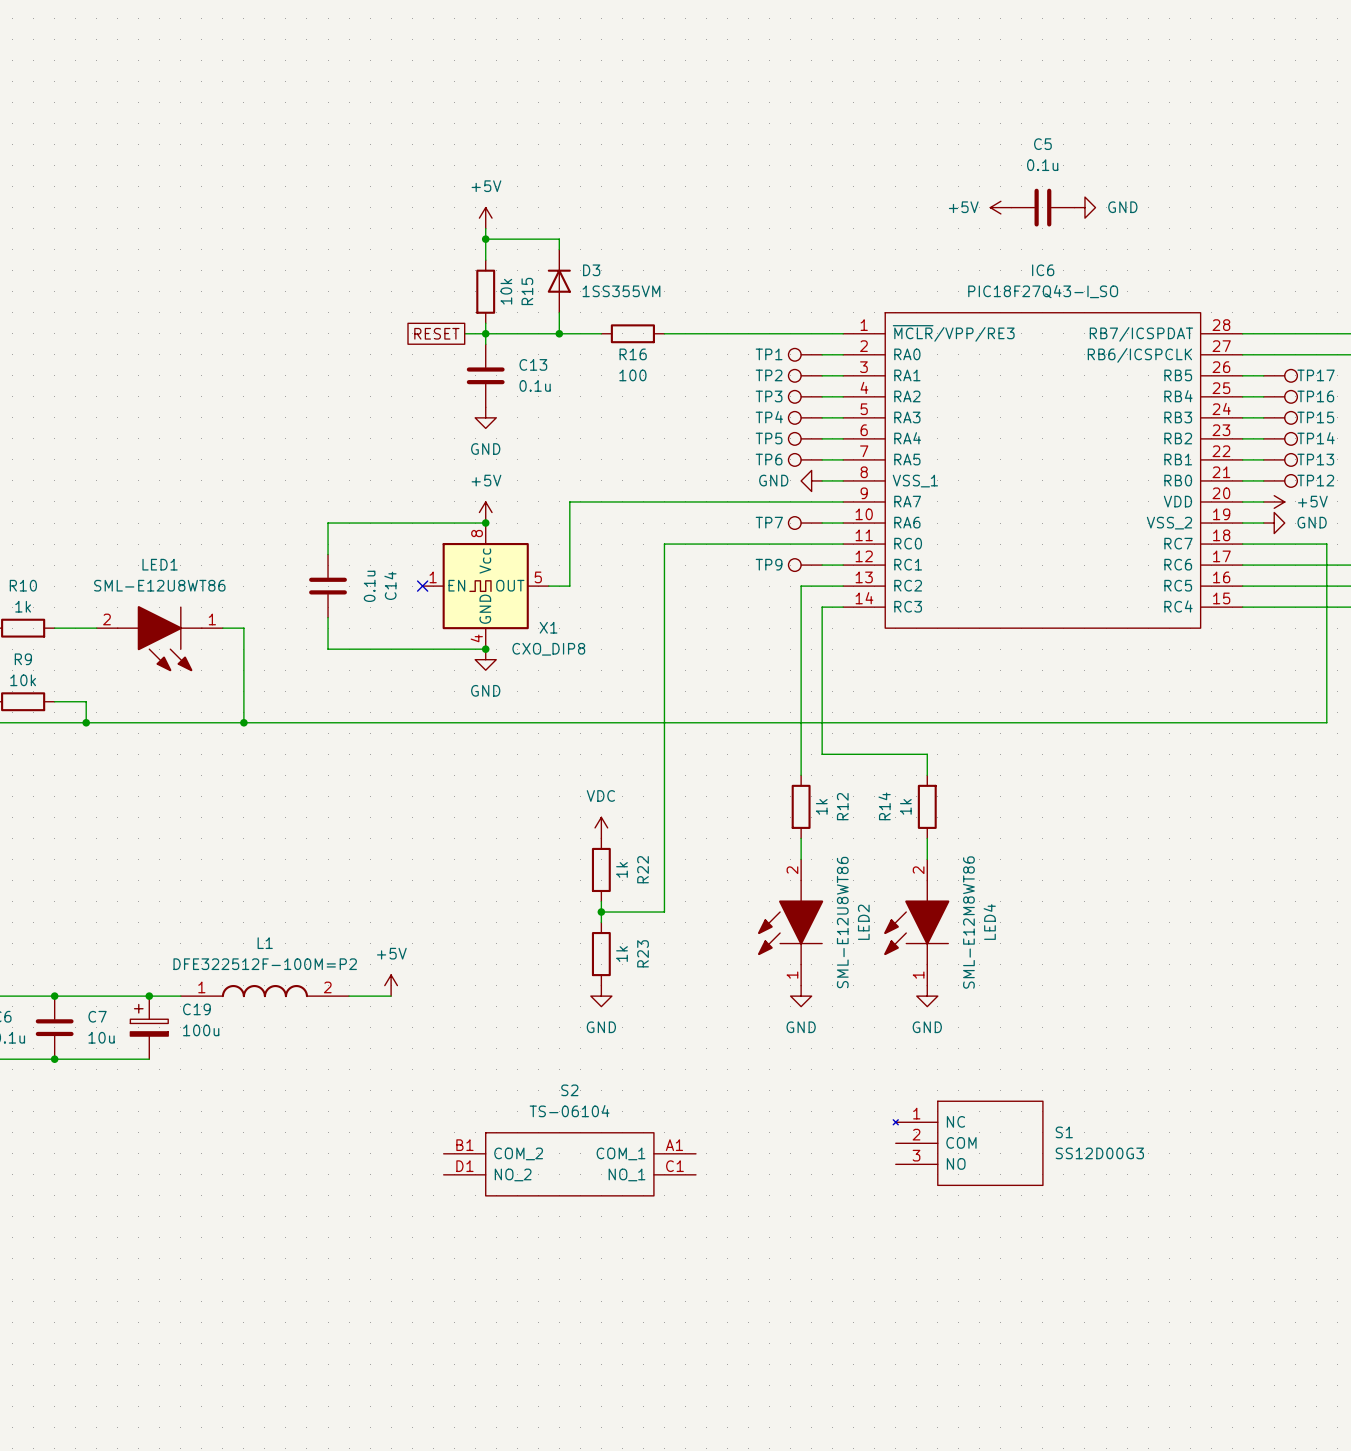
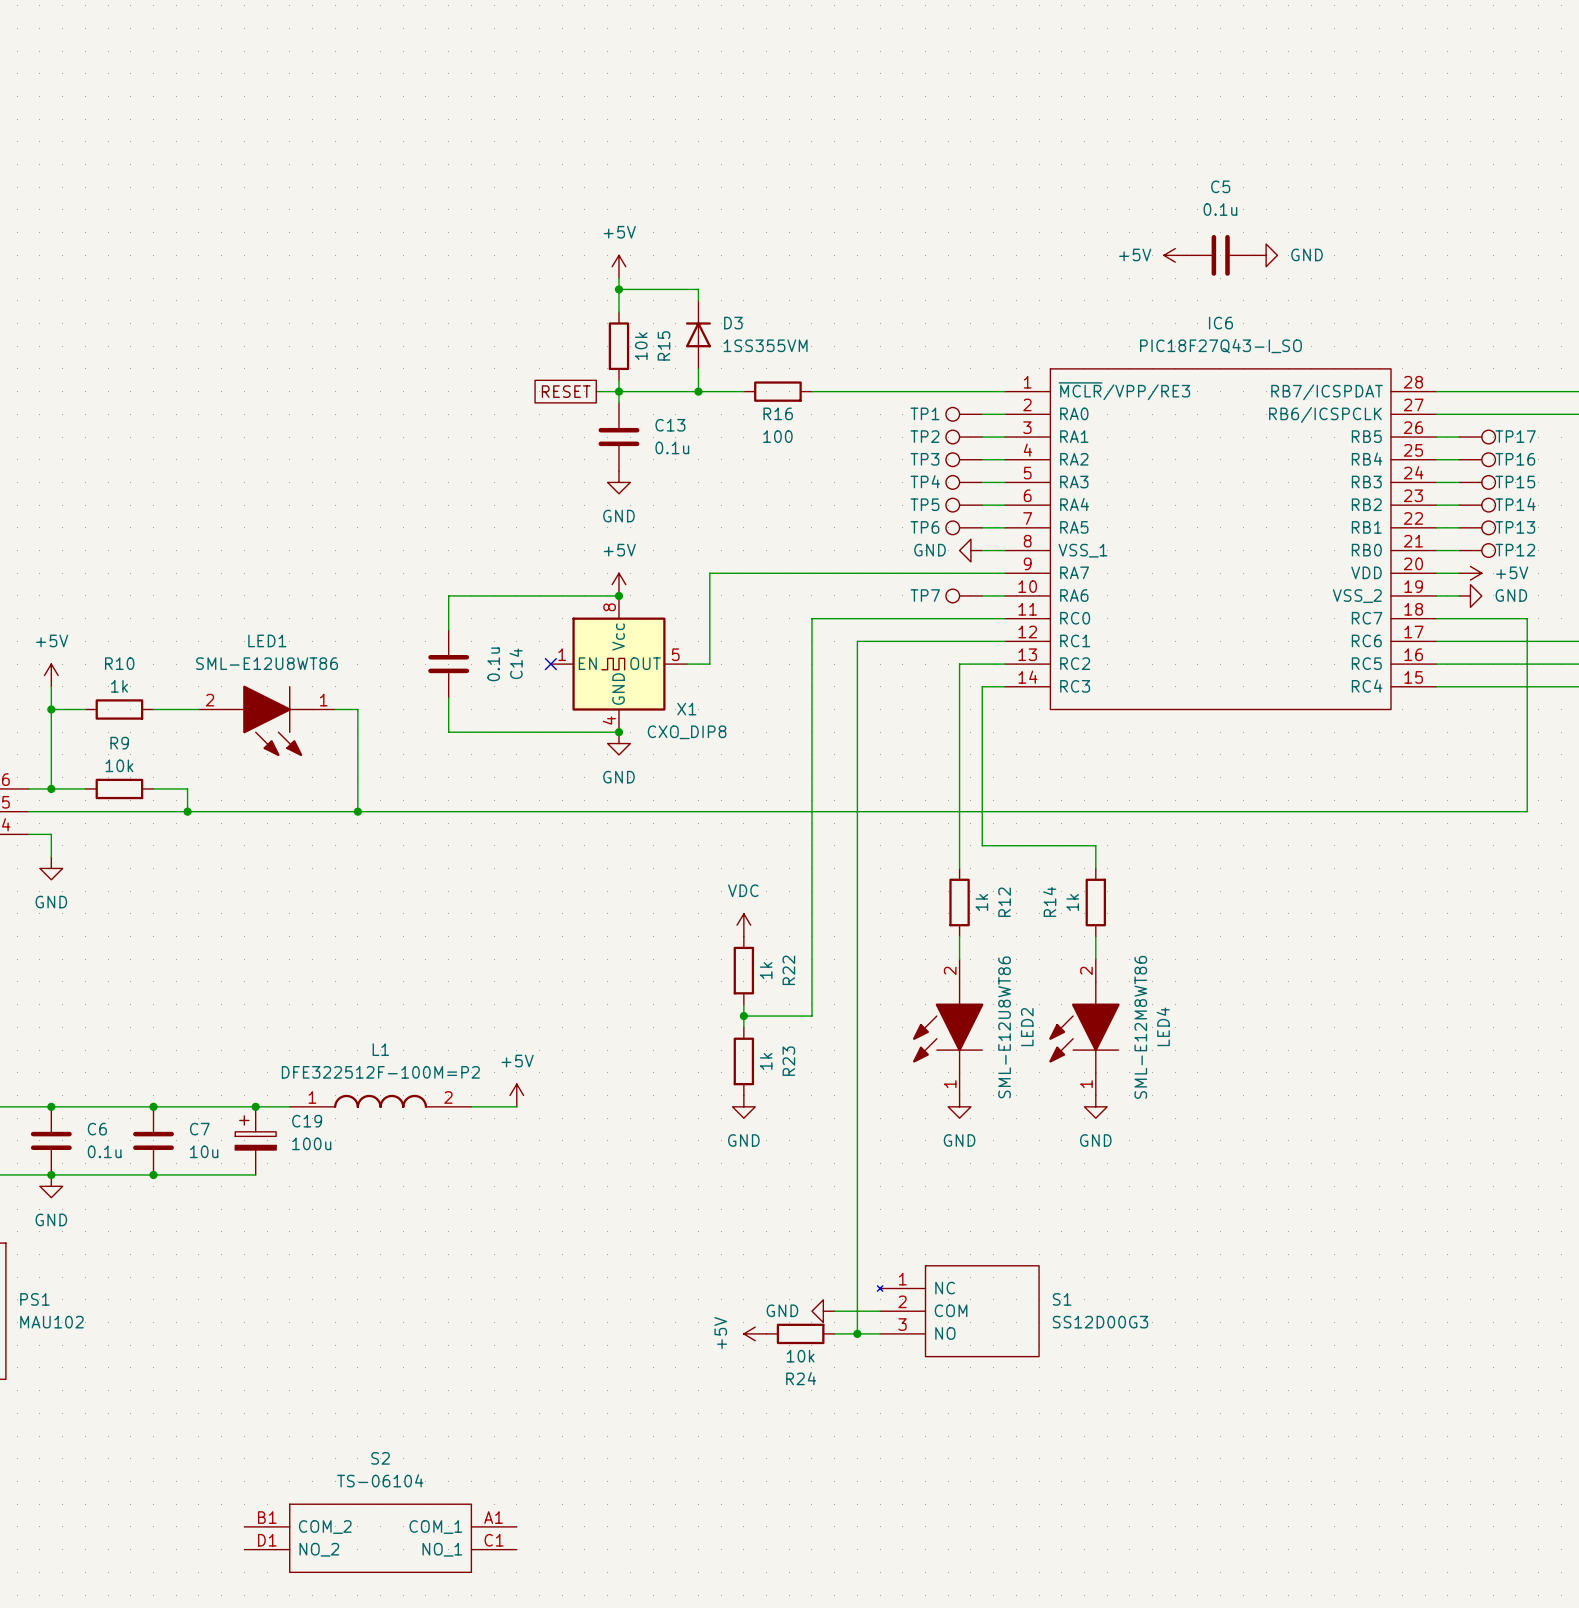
TP9: (805, 565) -> none
wire: none -> (982, 641) (857, 641) (857, 1333)
S1 position: (968, 1143) -> (958, 1311)
S2 position: (569, 1164) -> (380, 1538)
power symbol: none -> GND (823, 1311)
wire: none -> (834, 1311) (880, 1311)
power symbol: none -> +5V (755, 1333)
R24: none -> 10k (800, 1333)
wire: none -> (834, 1333) (880, 1333)
junction: none -> (857, 1333)

